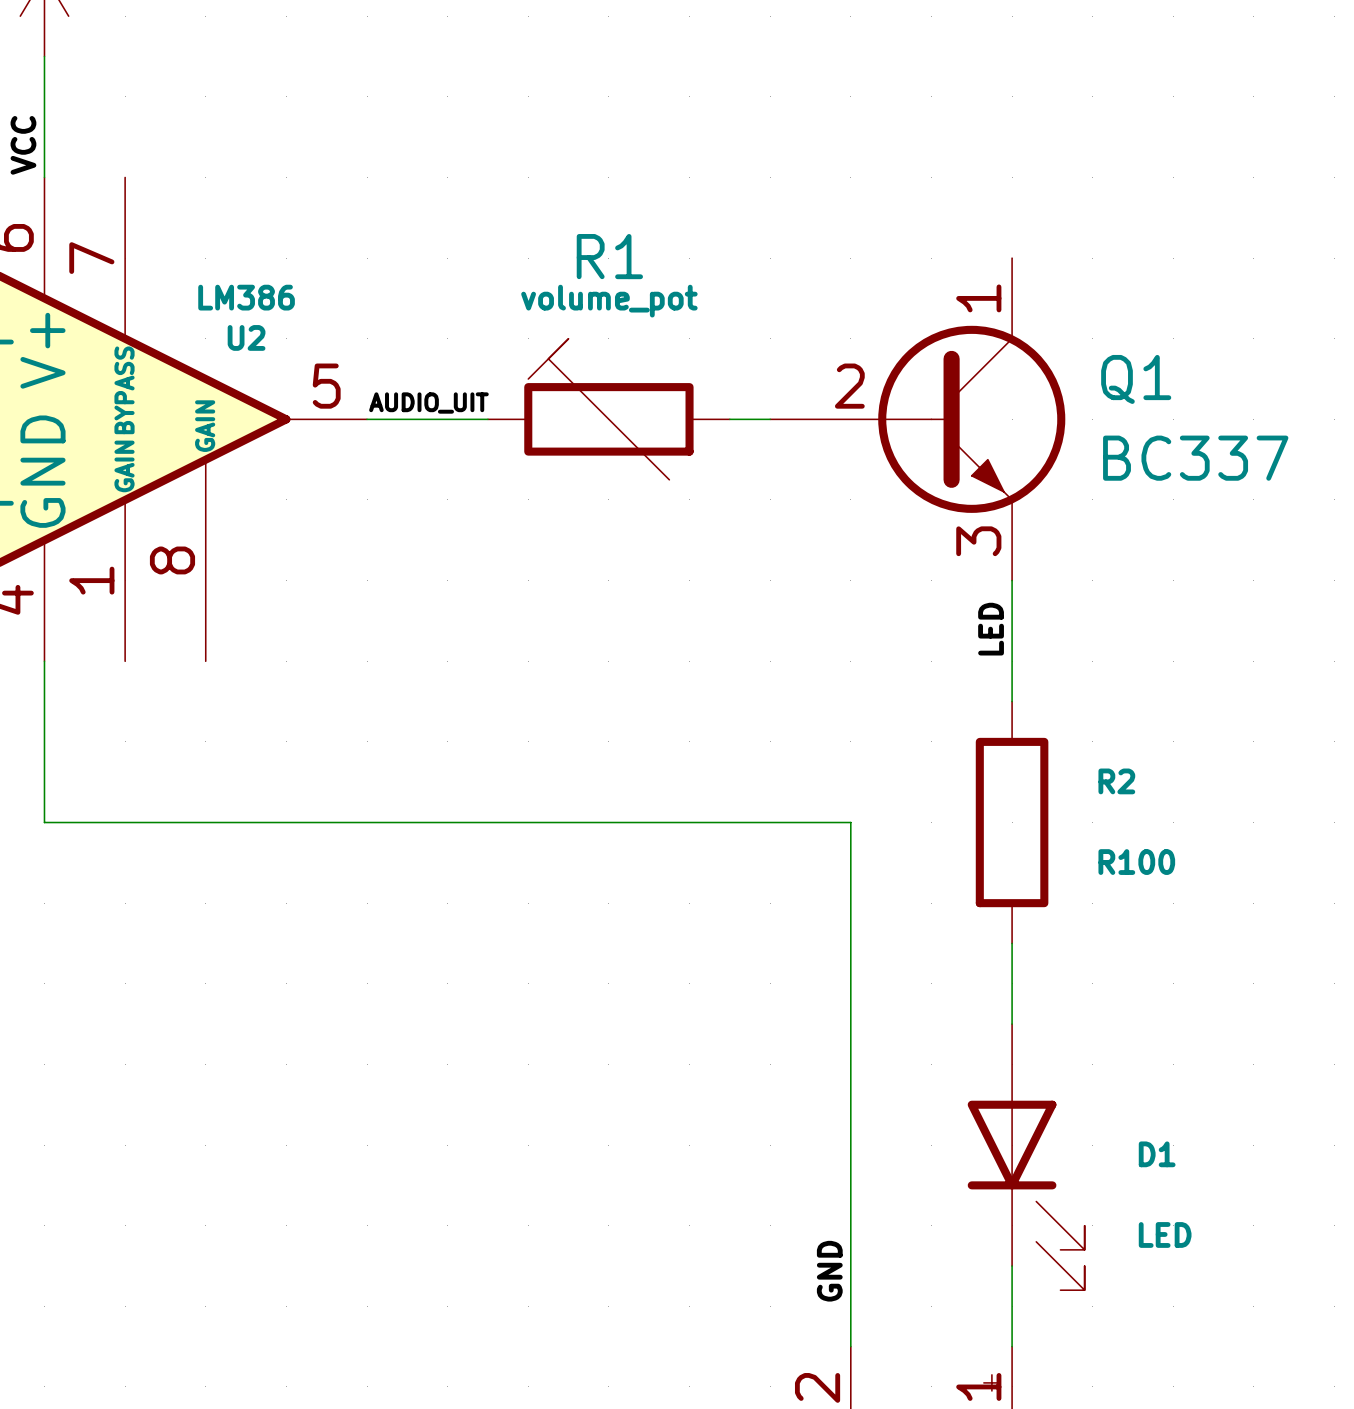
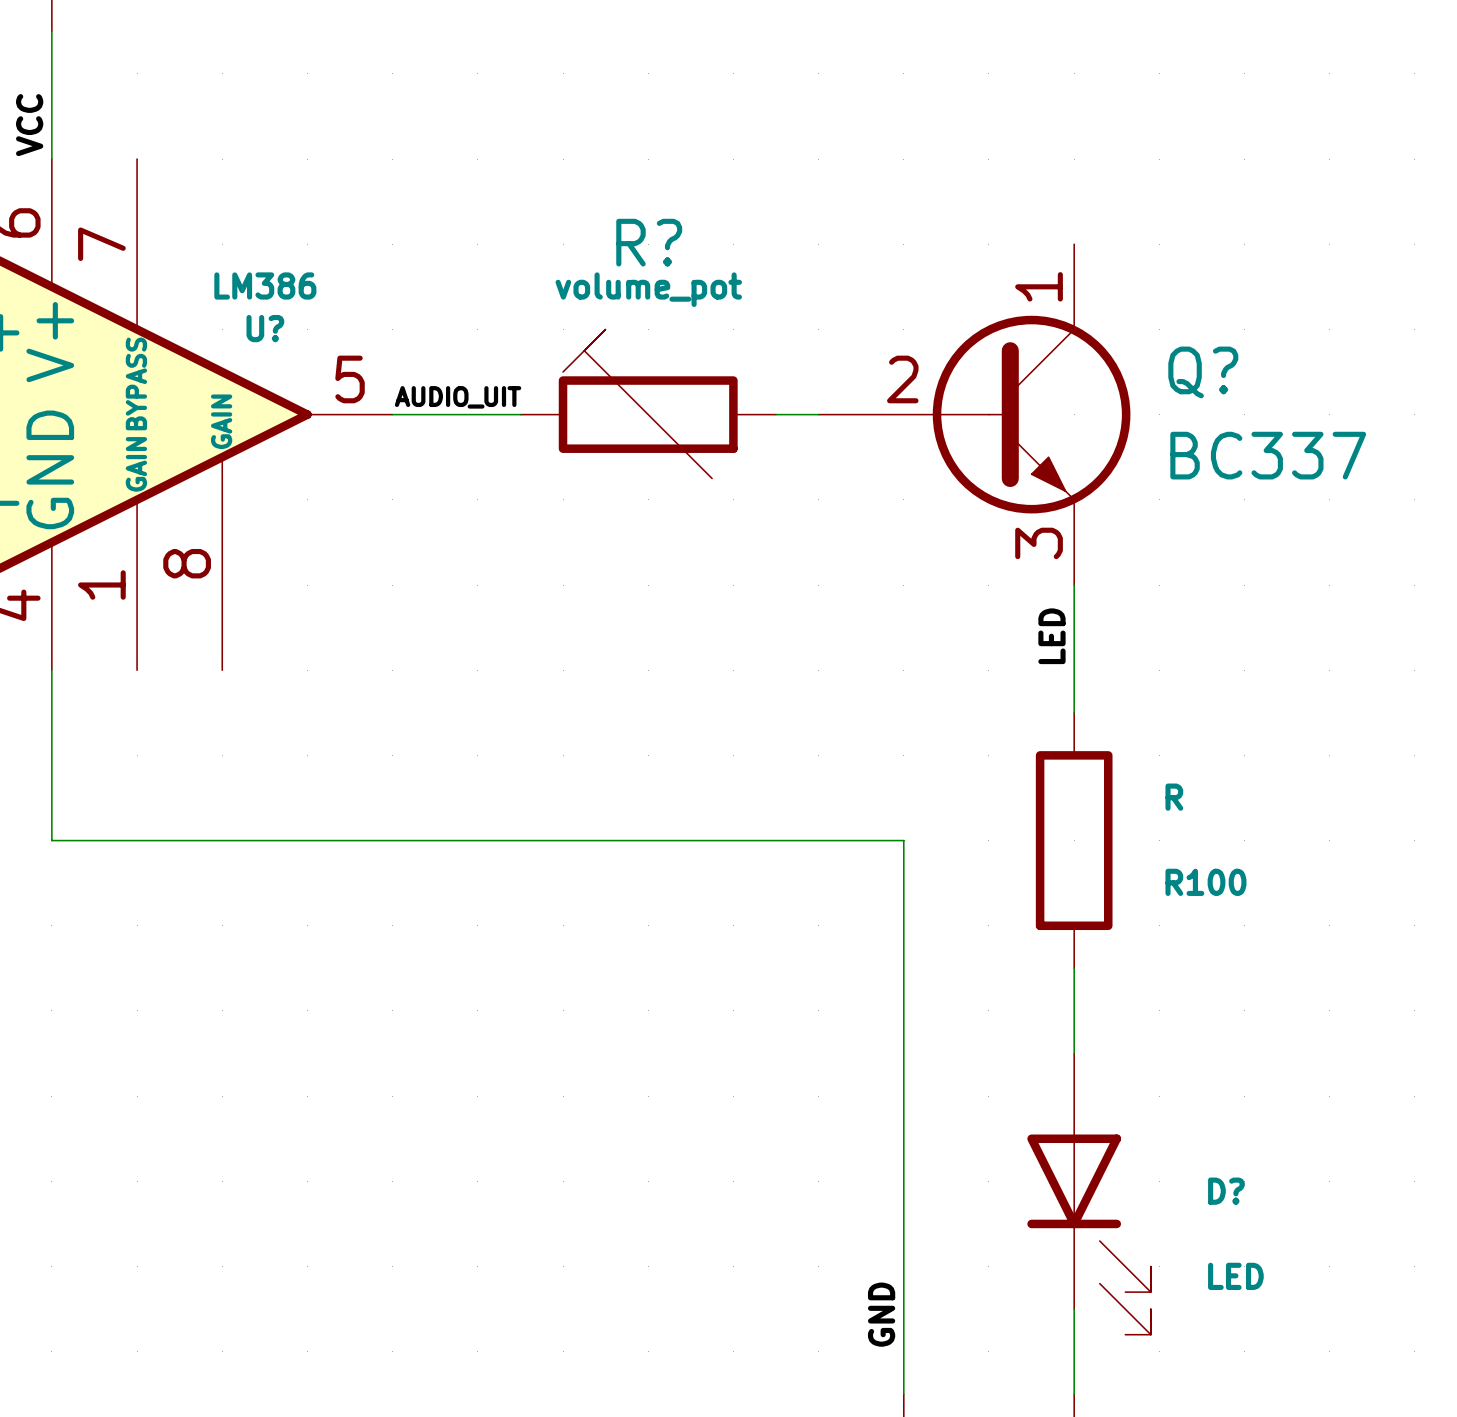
R1 name: R1 (609, 256) -> R? (649, 242)
U2 name: U2 (246, 337) -> U? (265, 328)
Q1 name: Q1 (1136, 379) -> Q? (1203, 372)
R2 name: R2 (1116, 781) -> R (1174, 797)
D1 name: D1 (1157, 1154) -> D? (1226, 1191)

